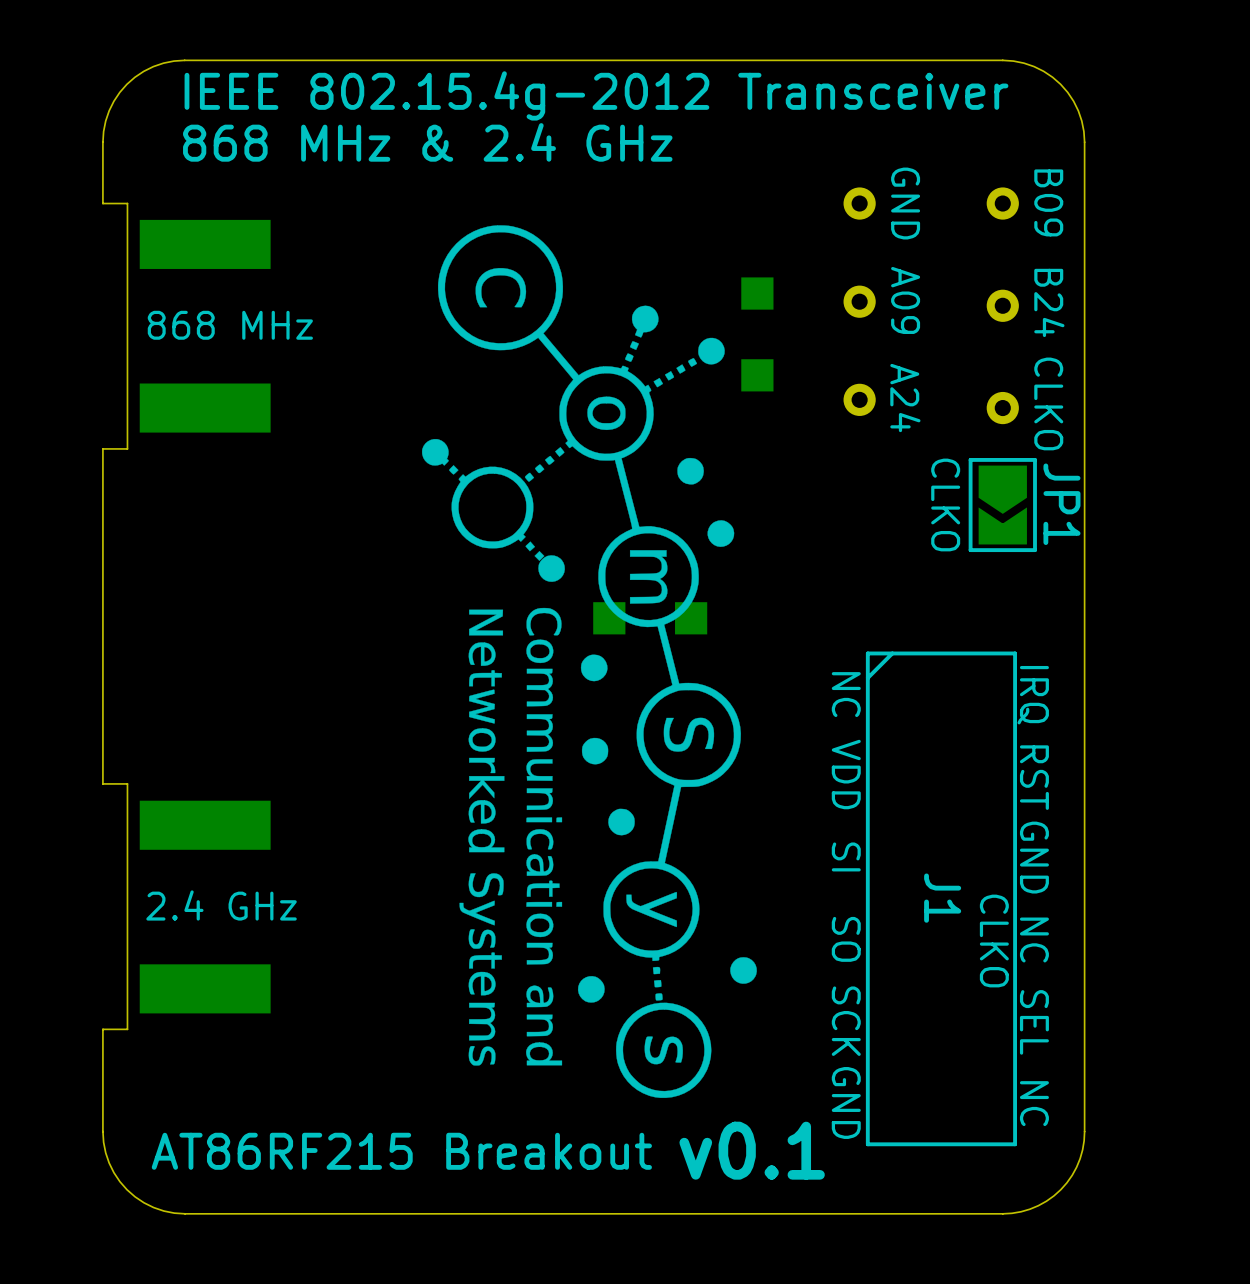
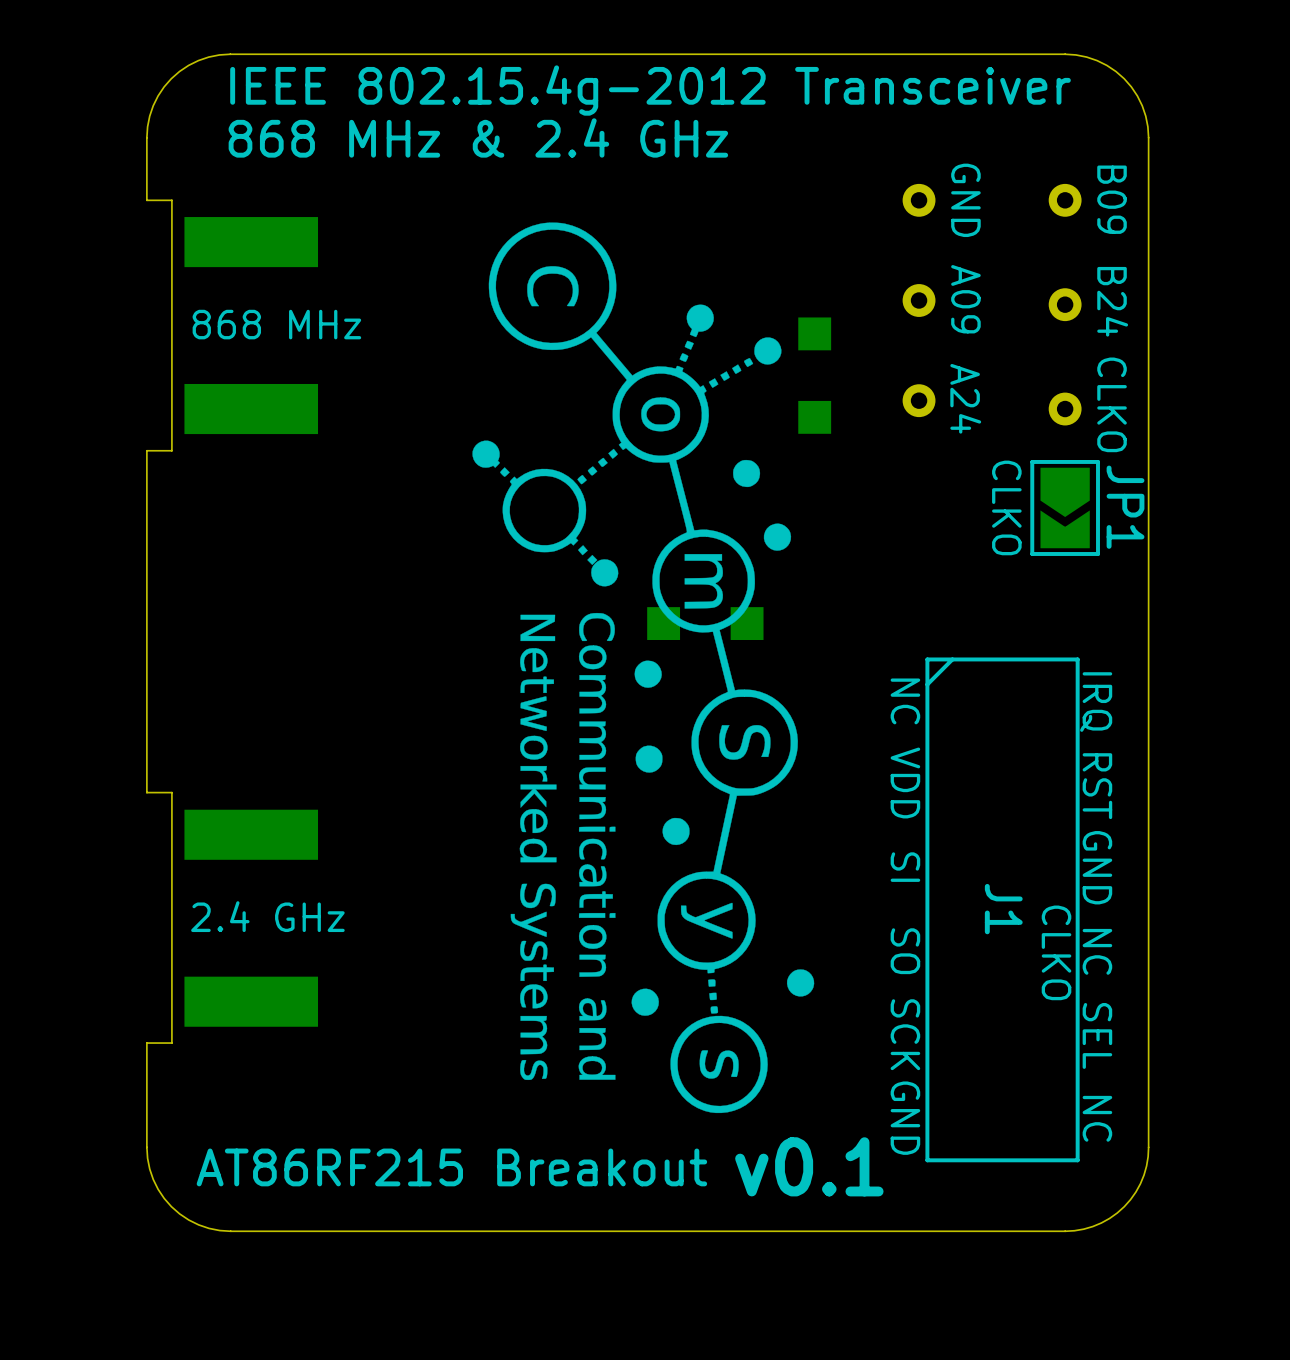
part position: (757, 334) -> (814, 375)

